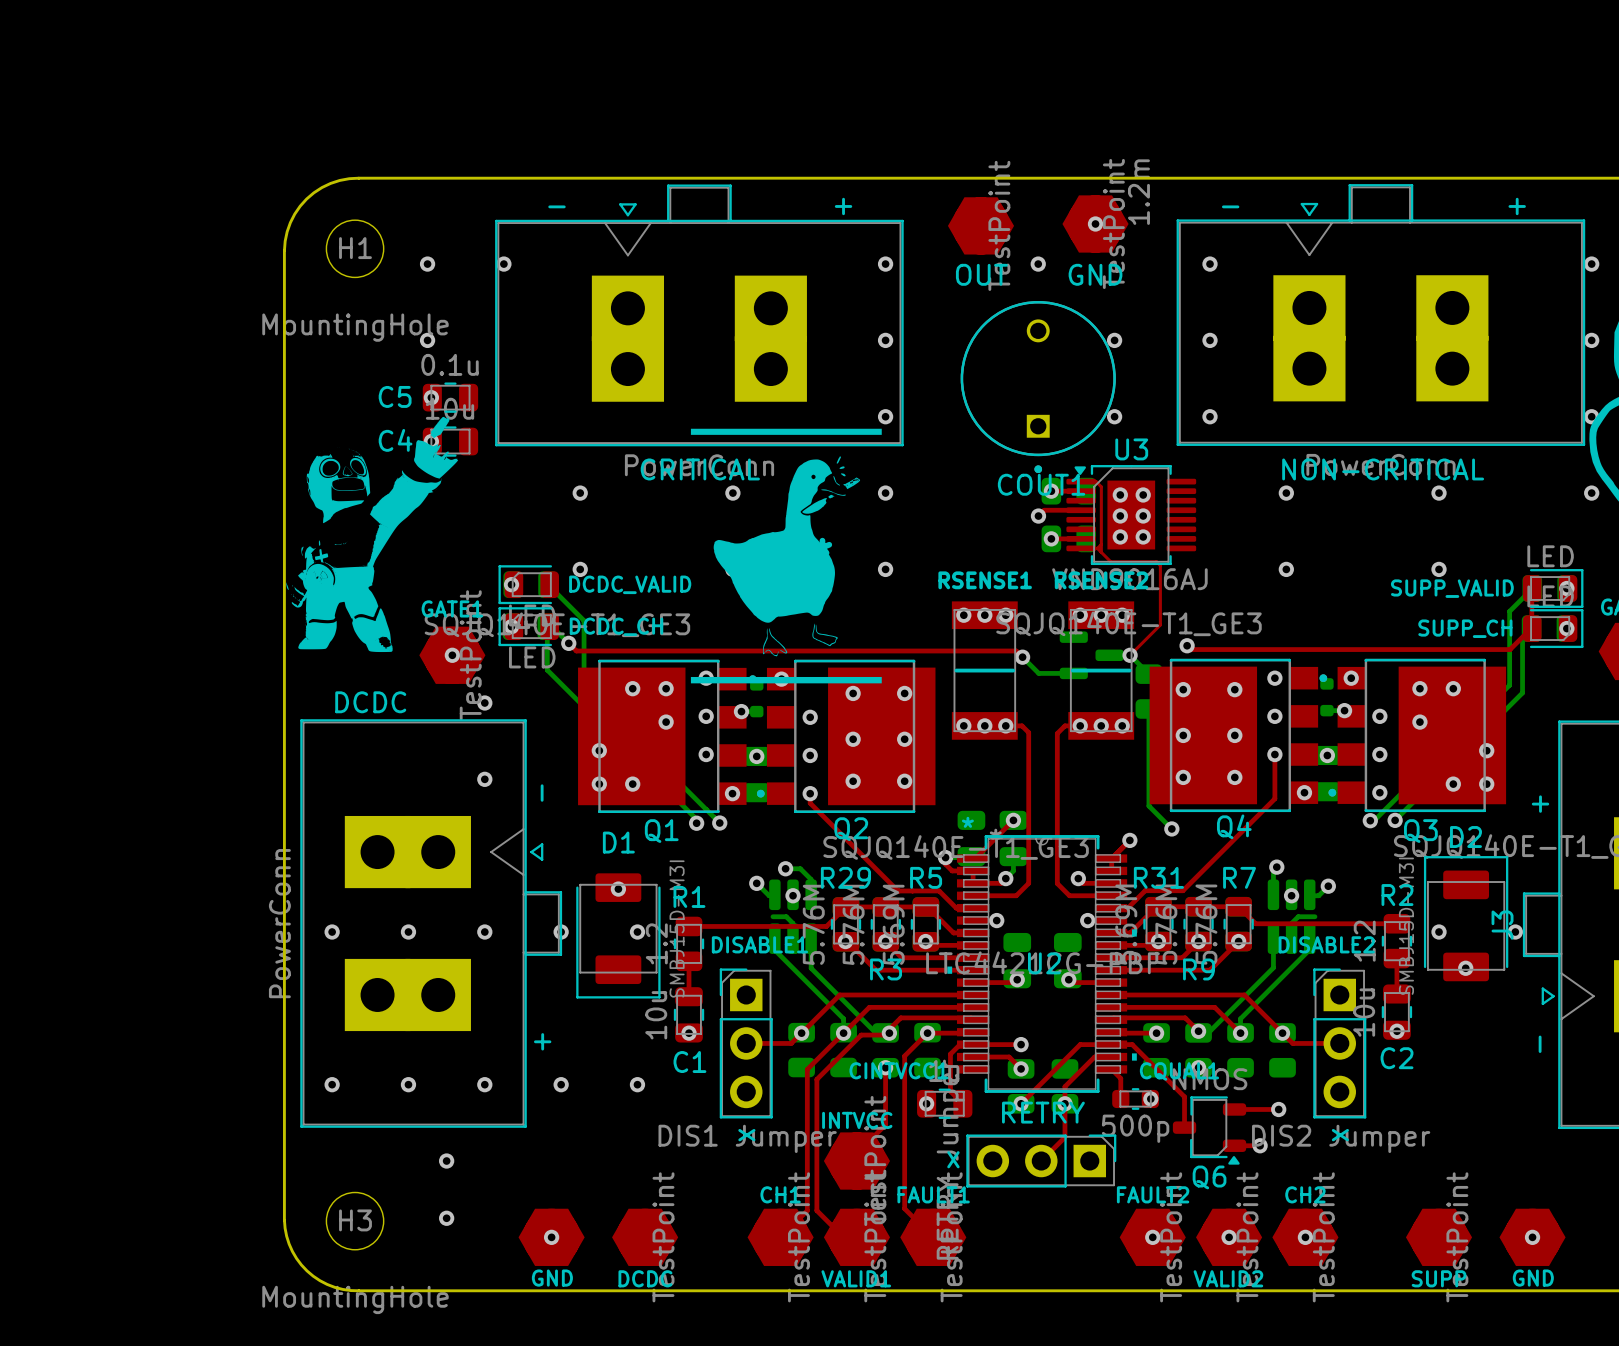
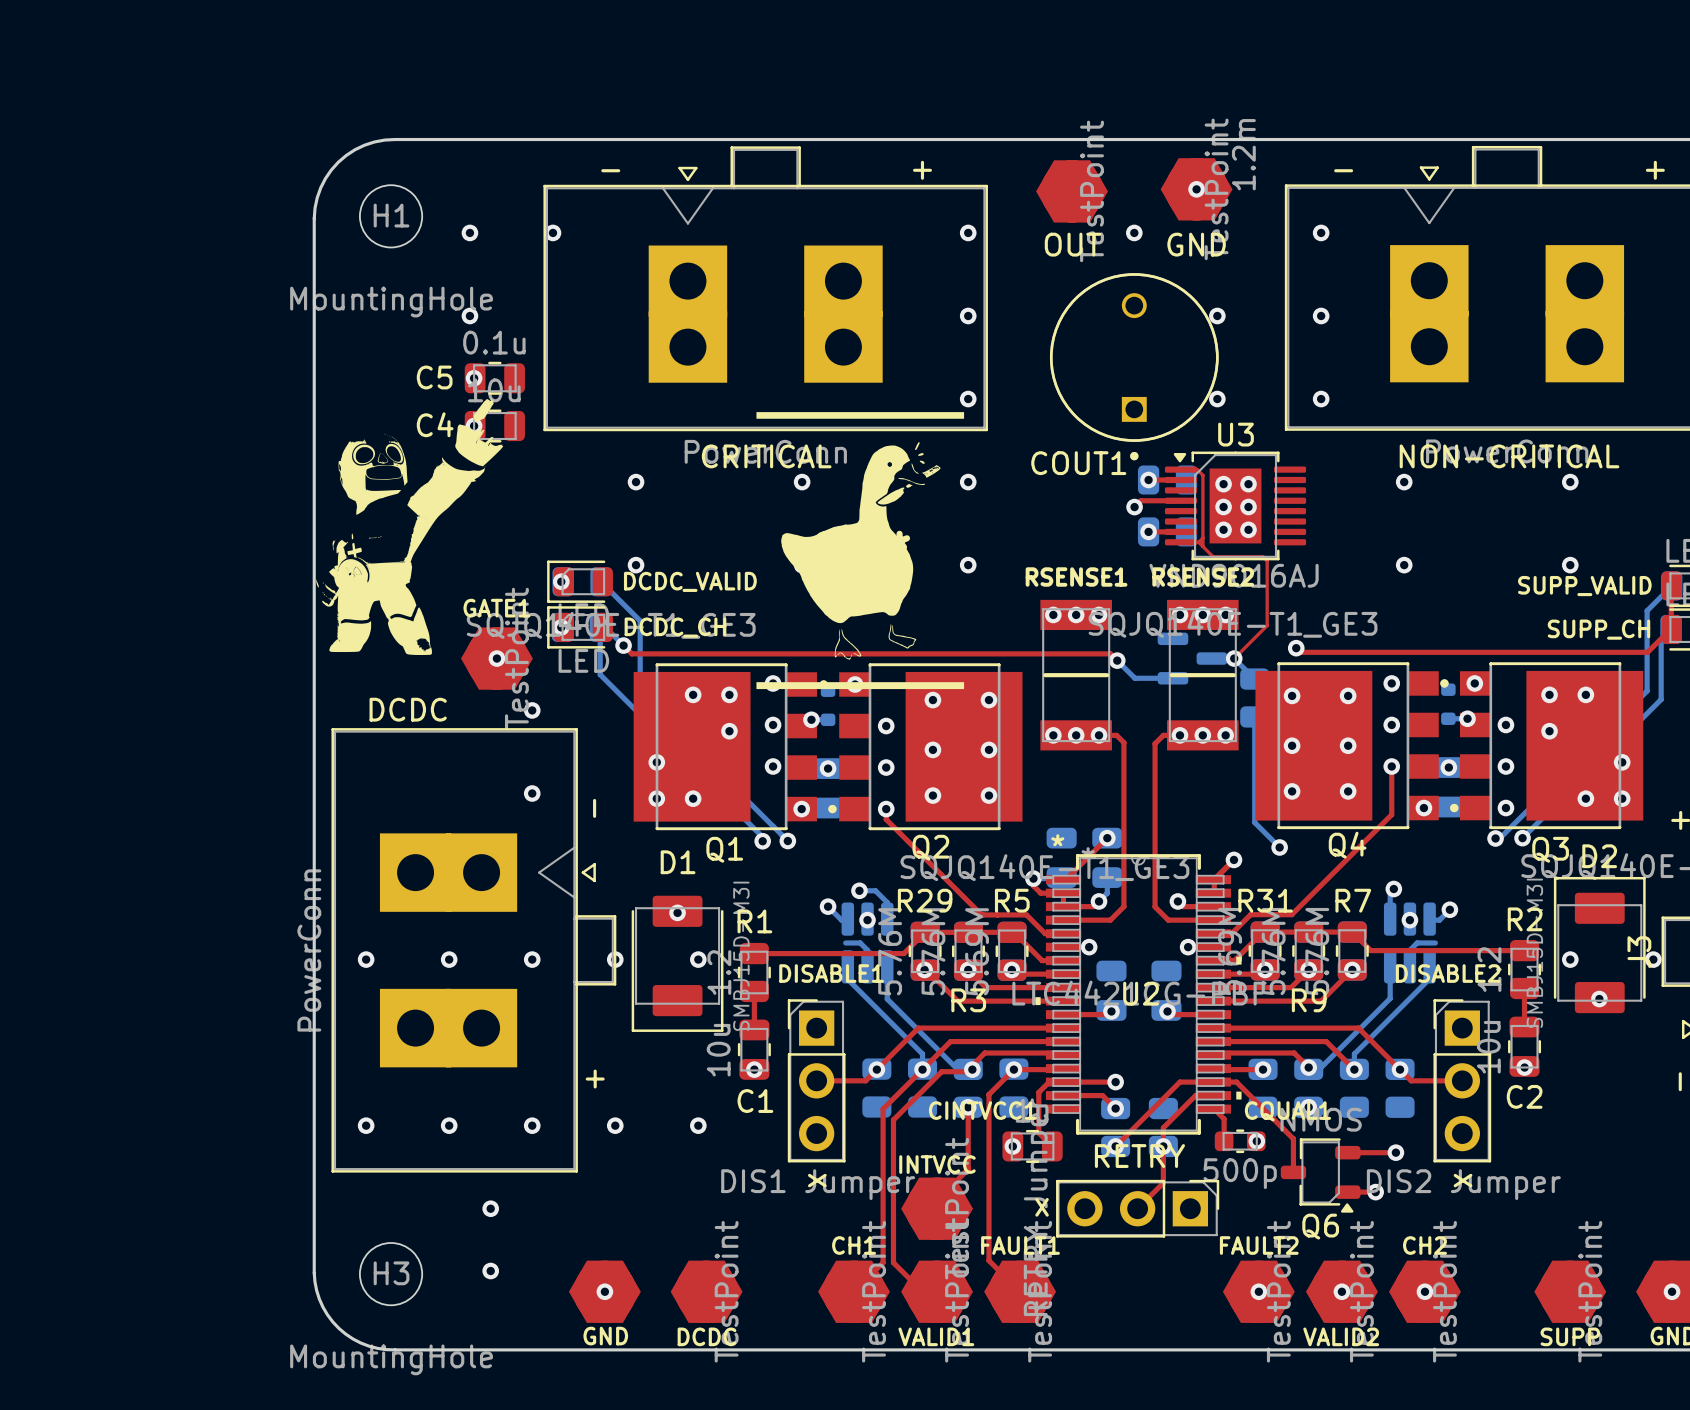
COUT1 name position: COUT1 (1041, 484) -> COUT1 (1078, 463)

